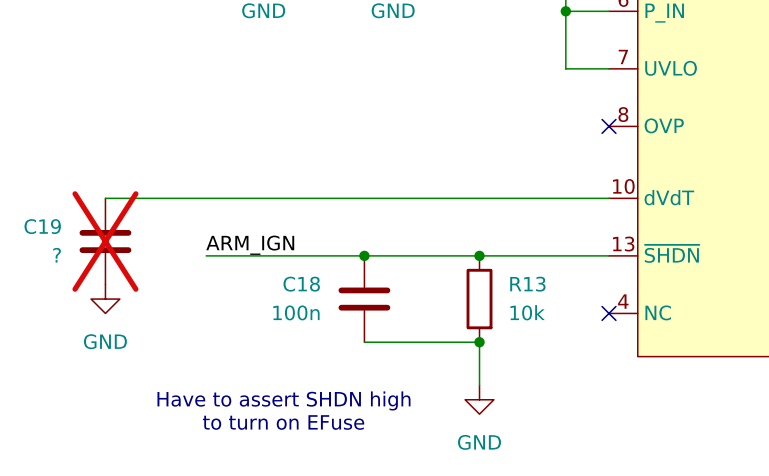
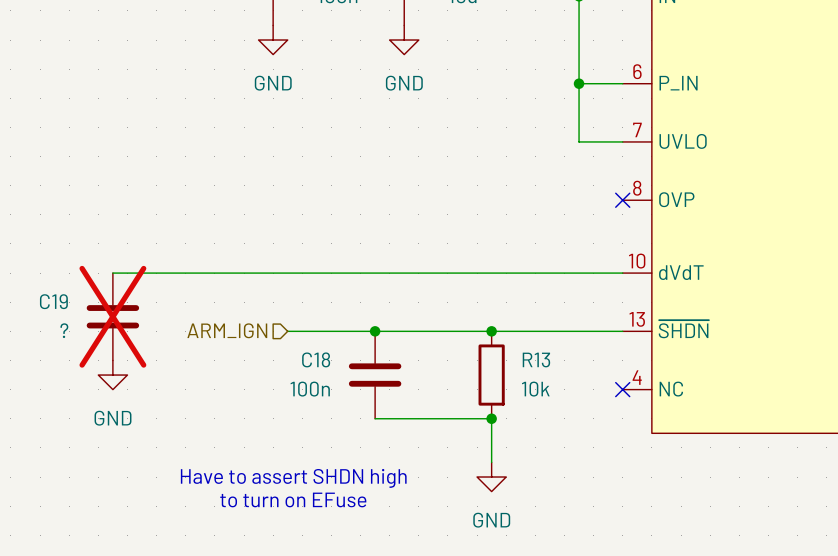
label: ARM_IGN (250, 245) -> none
wire: (206, 255) (278, 255) -> none
hierarchical label: none -> ARM_IGN (227, 330)

